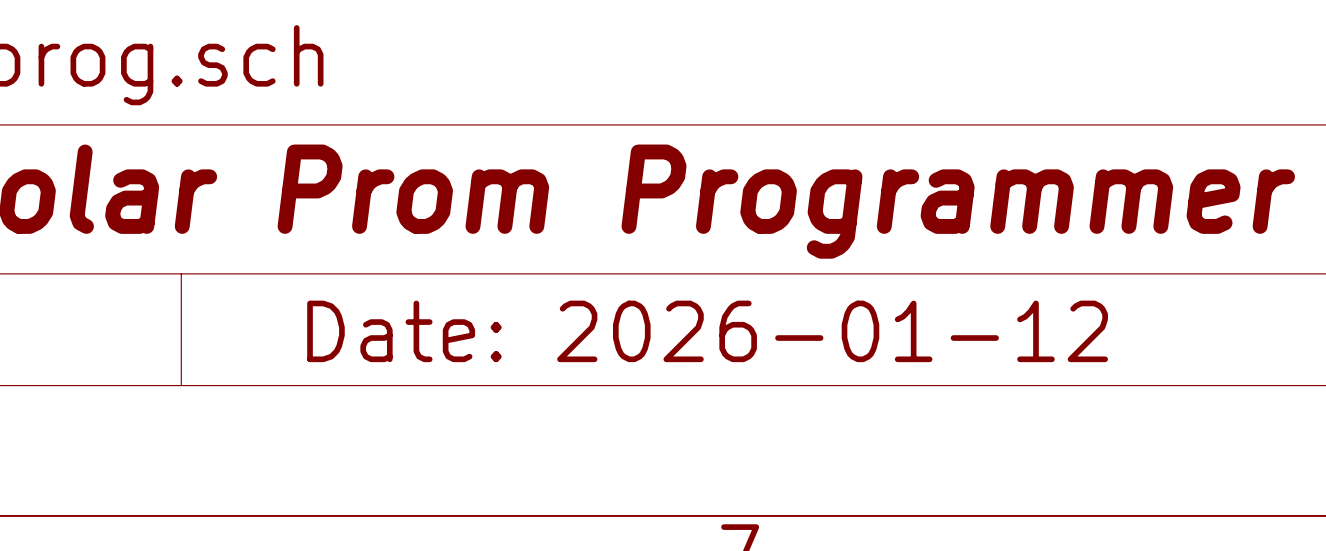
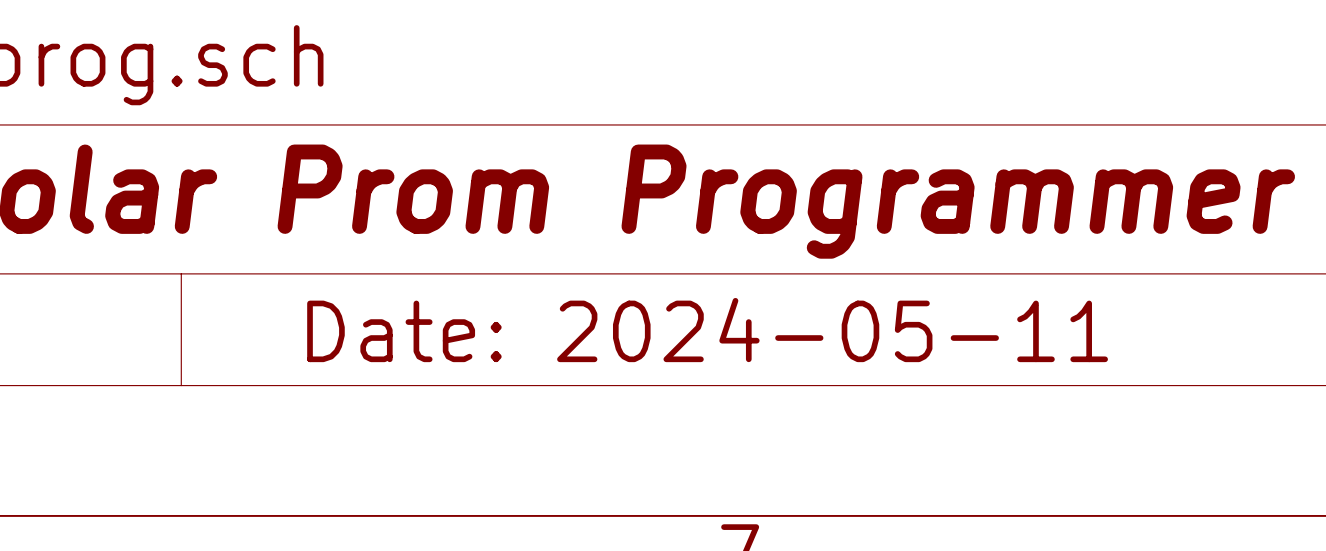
title block: Date: 2026-01-12 (707, 331) -> Date: 2024-05-11 (707, 330)

